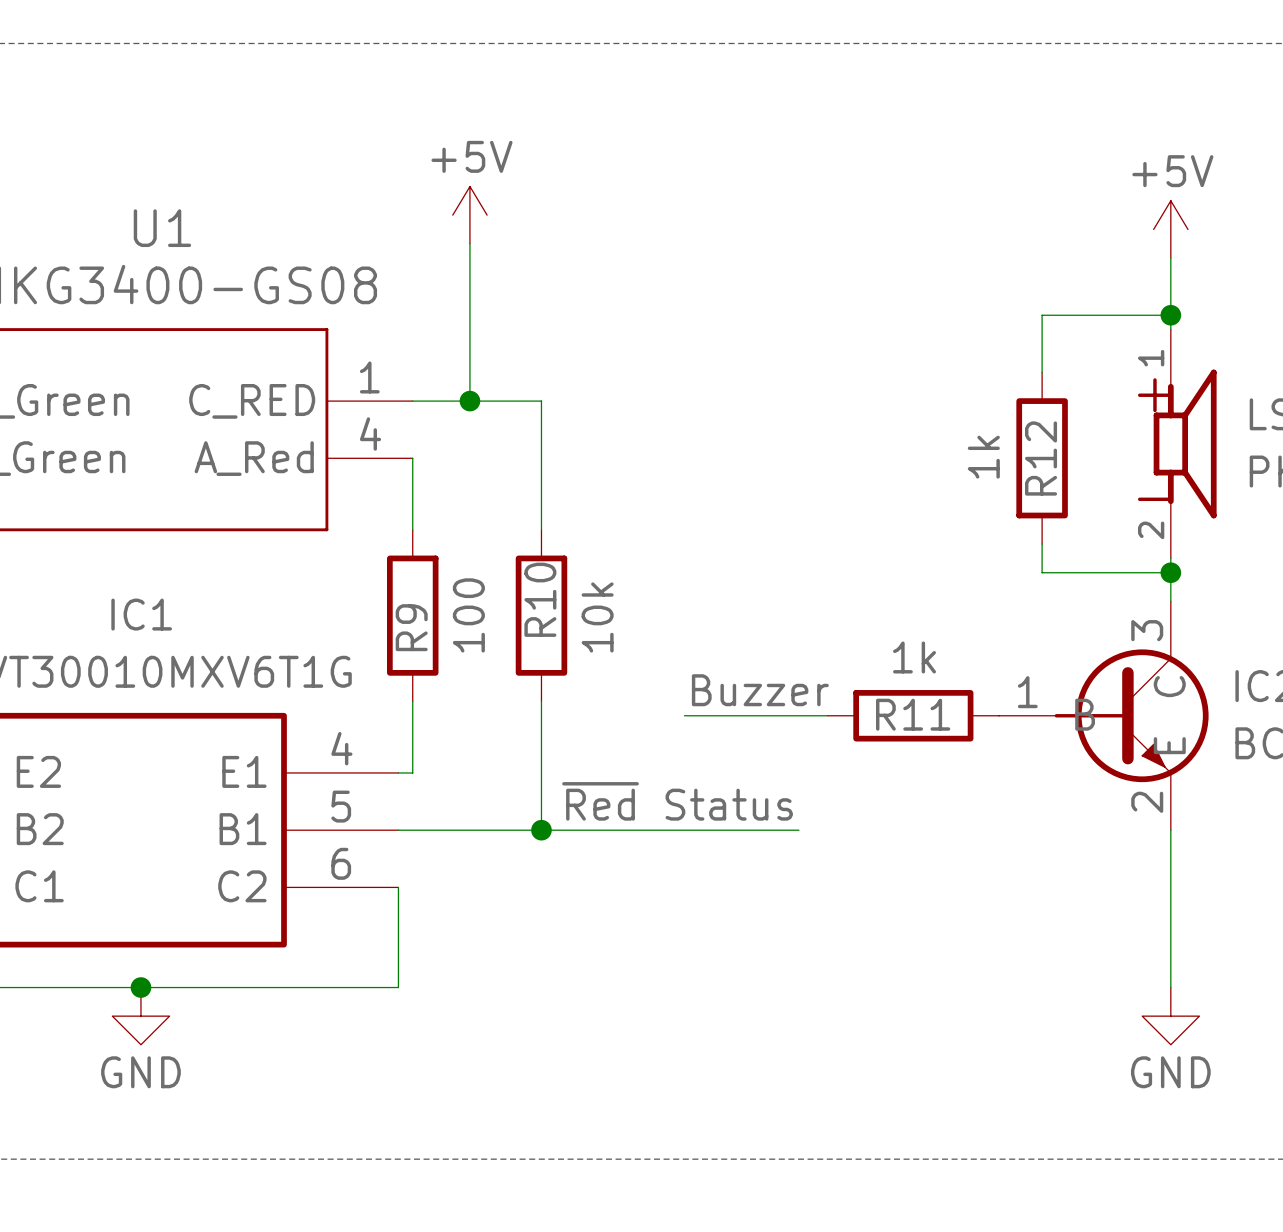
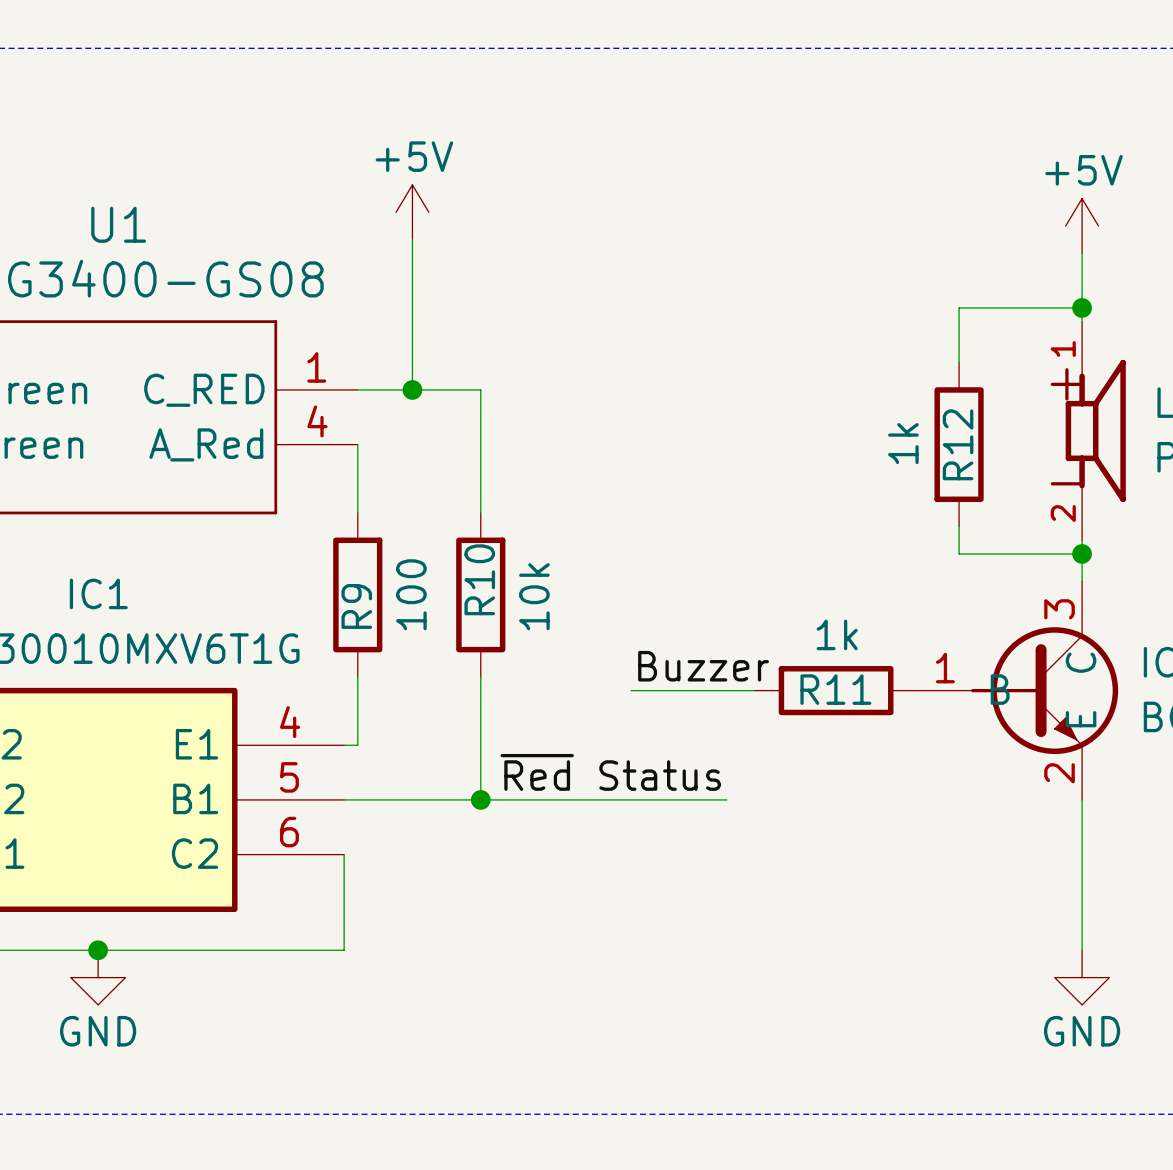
label position: Buzzer (760, 690) -> Buzzer (703, 666)
wire: (684, 715) (698, 715) -> none

